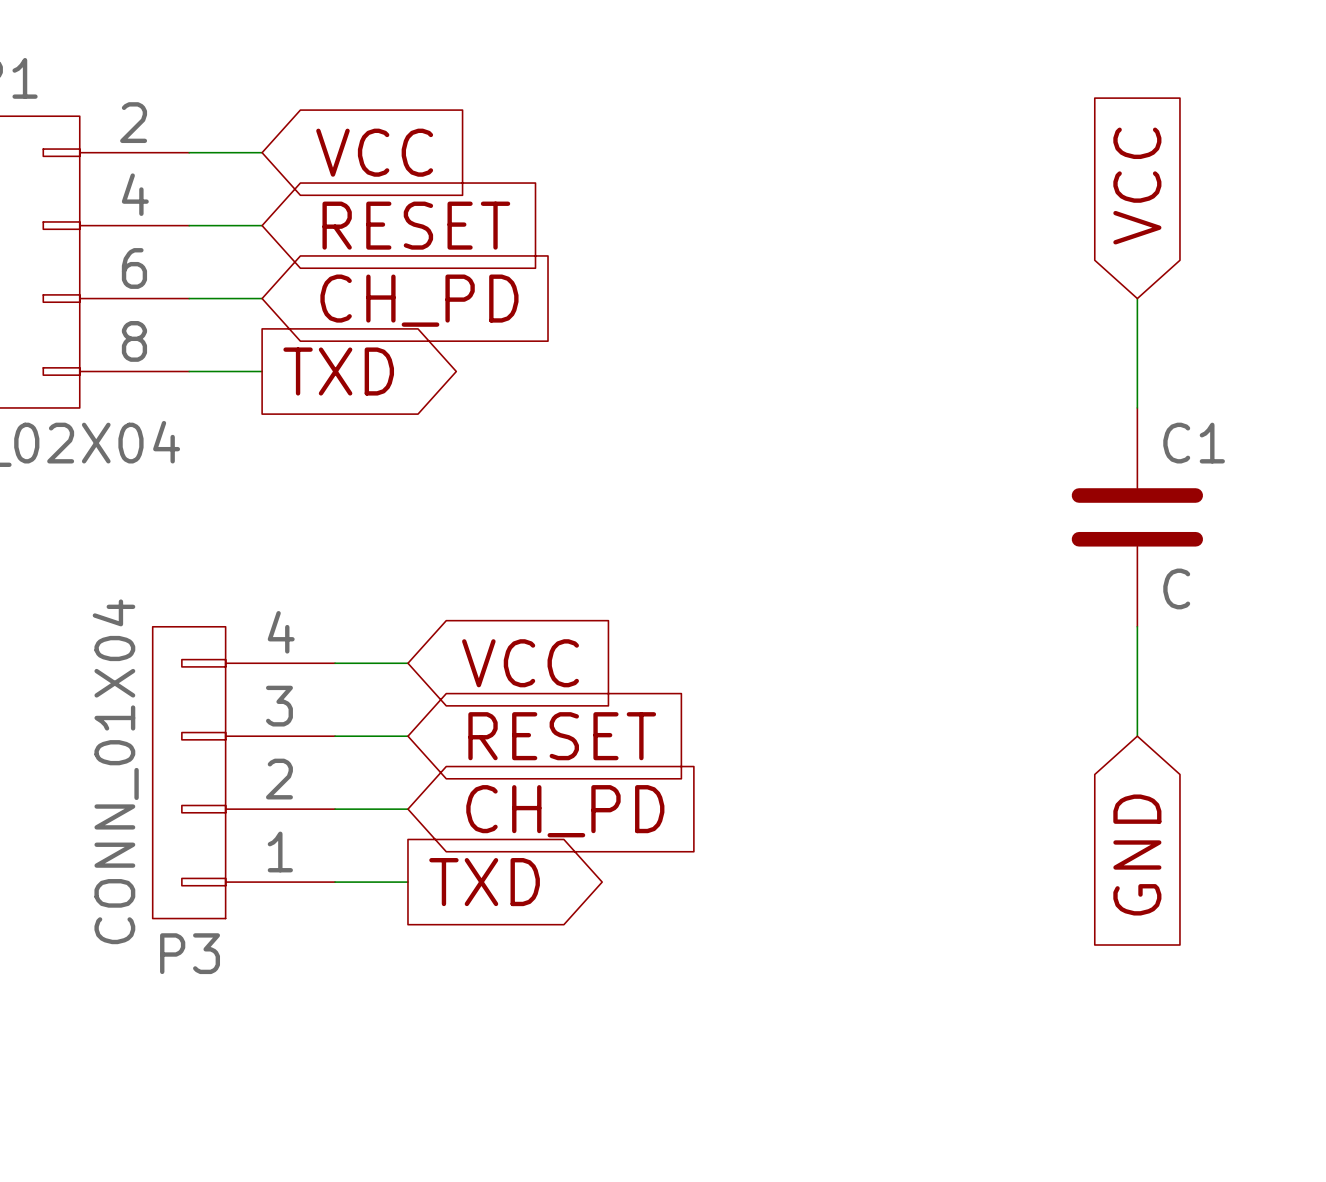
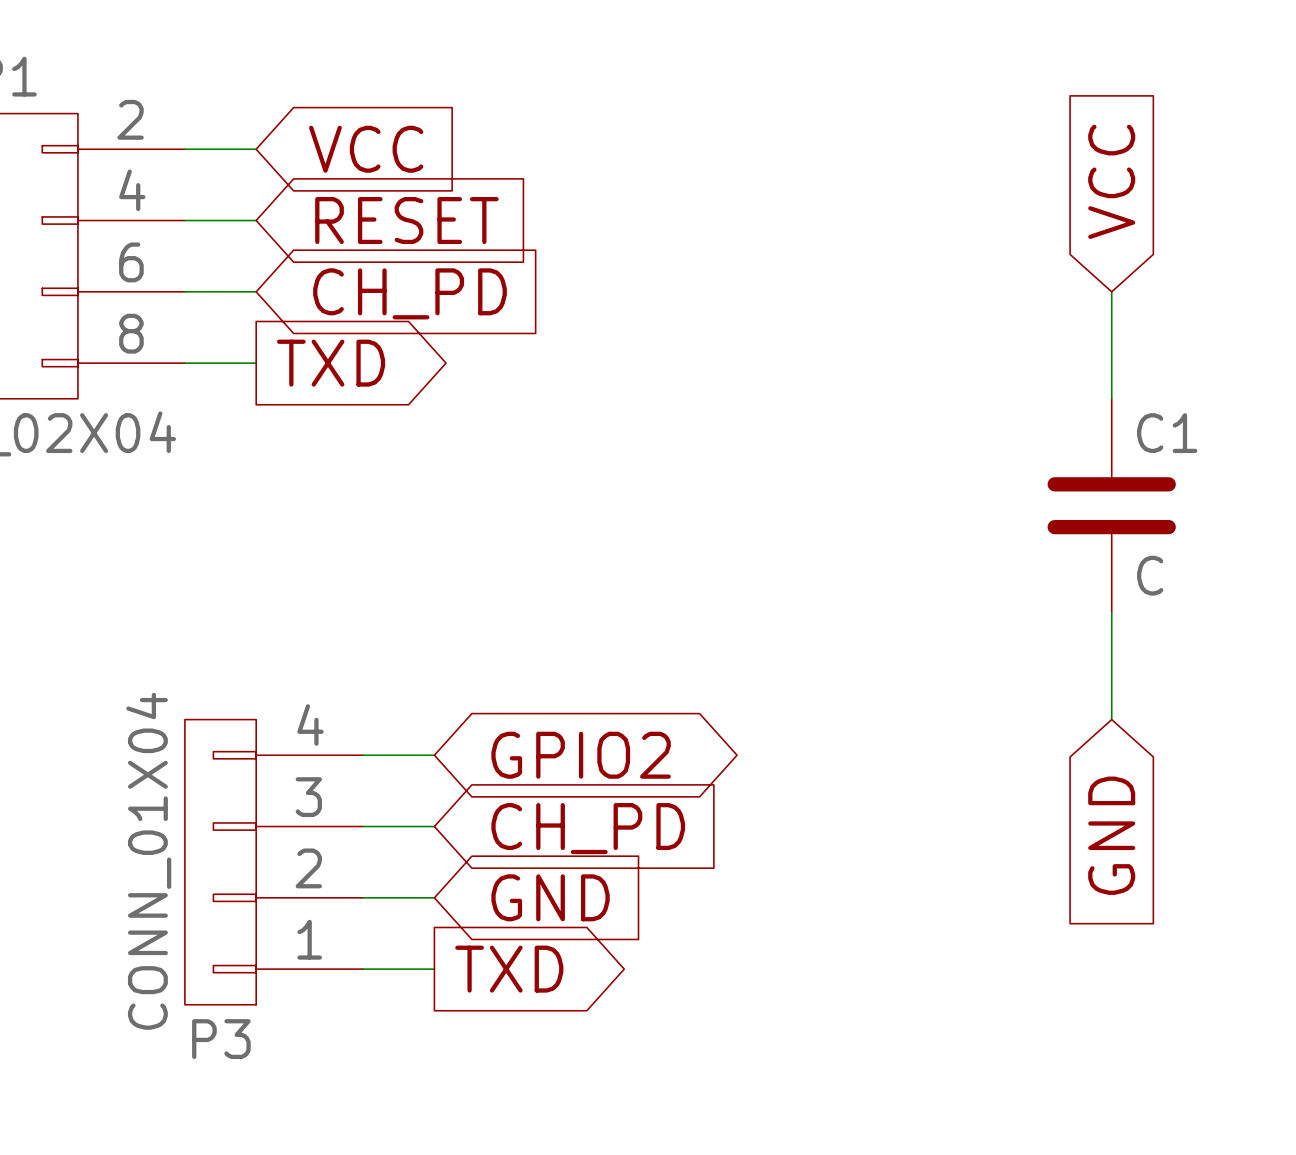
wire: (335, 663) (407, 663) -> (363, 755) (434, 755)
global label: VCC (520, 663) -> none
wire: (335, 736) (407, 736) -> (363, 826) (434, 826)
global label: RESET (562, 736) -> none
P3 position: (243, 772) -> (274, 862)
global label: none -> GPIO2 (581, 755)
wire: (335, 809) (407, 809) -> (363, 897) (434, 897)
global label position: CH_PD (565, 811) -> CH_PD (588, 828)
wire: (335, 882) (407, 882) -> (363, 969) (434, 969)
global label position: TXD (484, 882) -> TXD (509, 969)
global label: none -> GND (550, 897)

